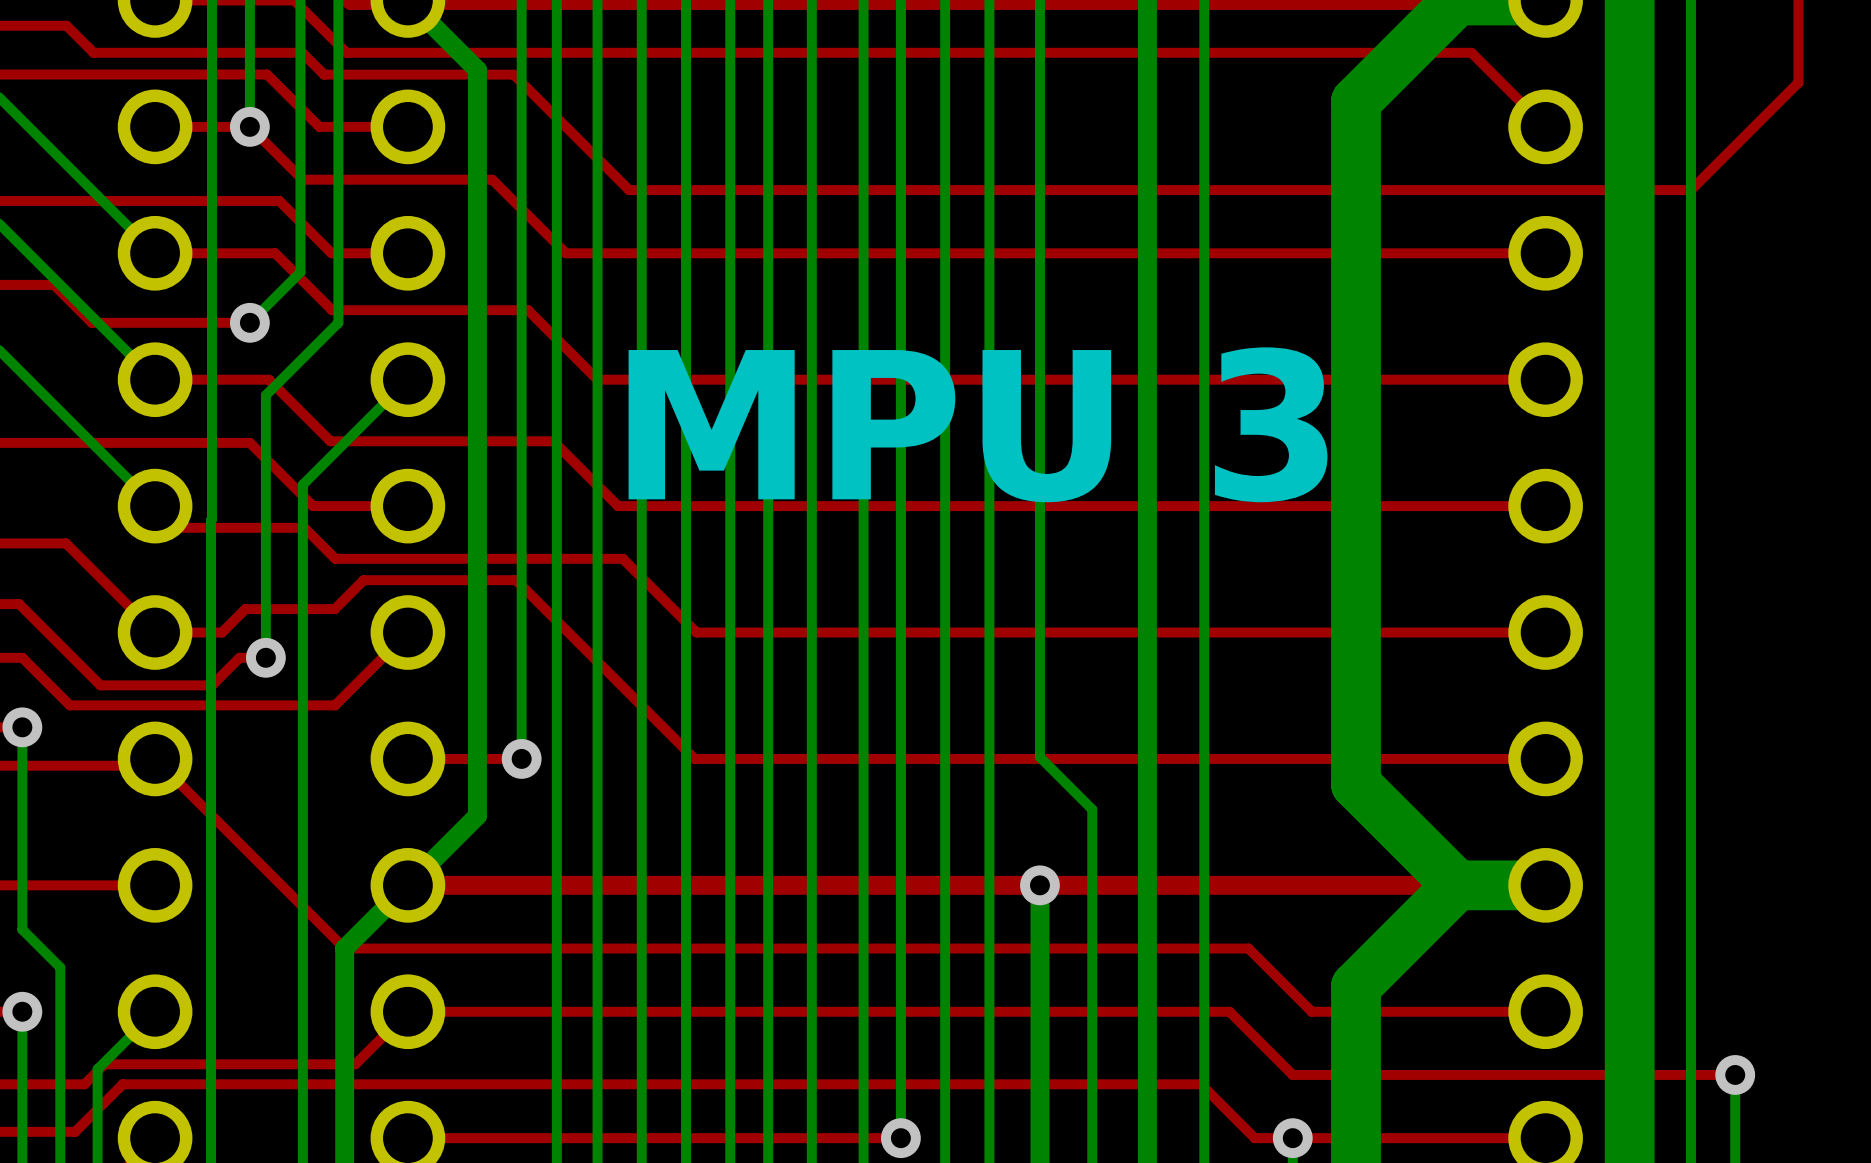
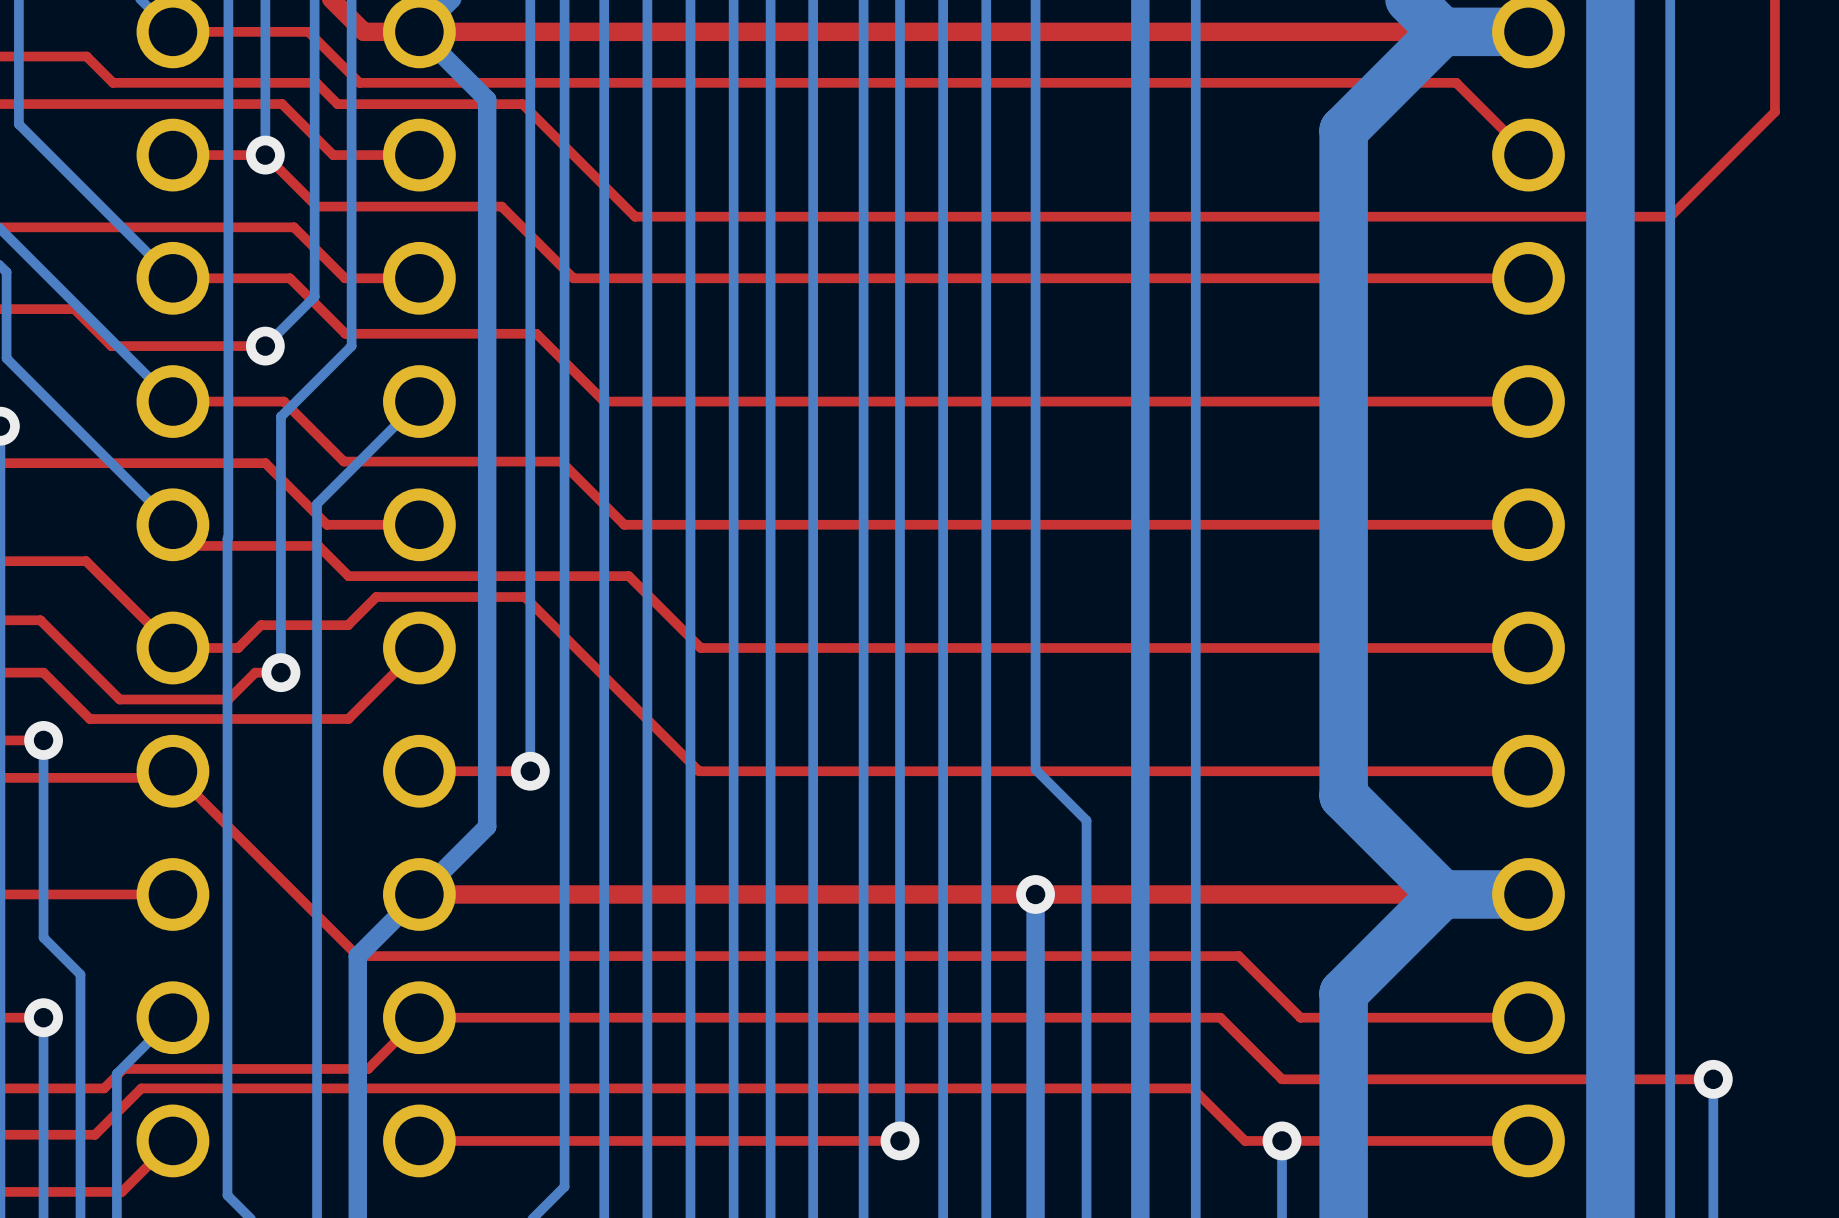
text: MPU 3 (978, 424) -> none

